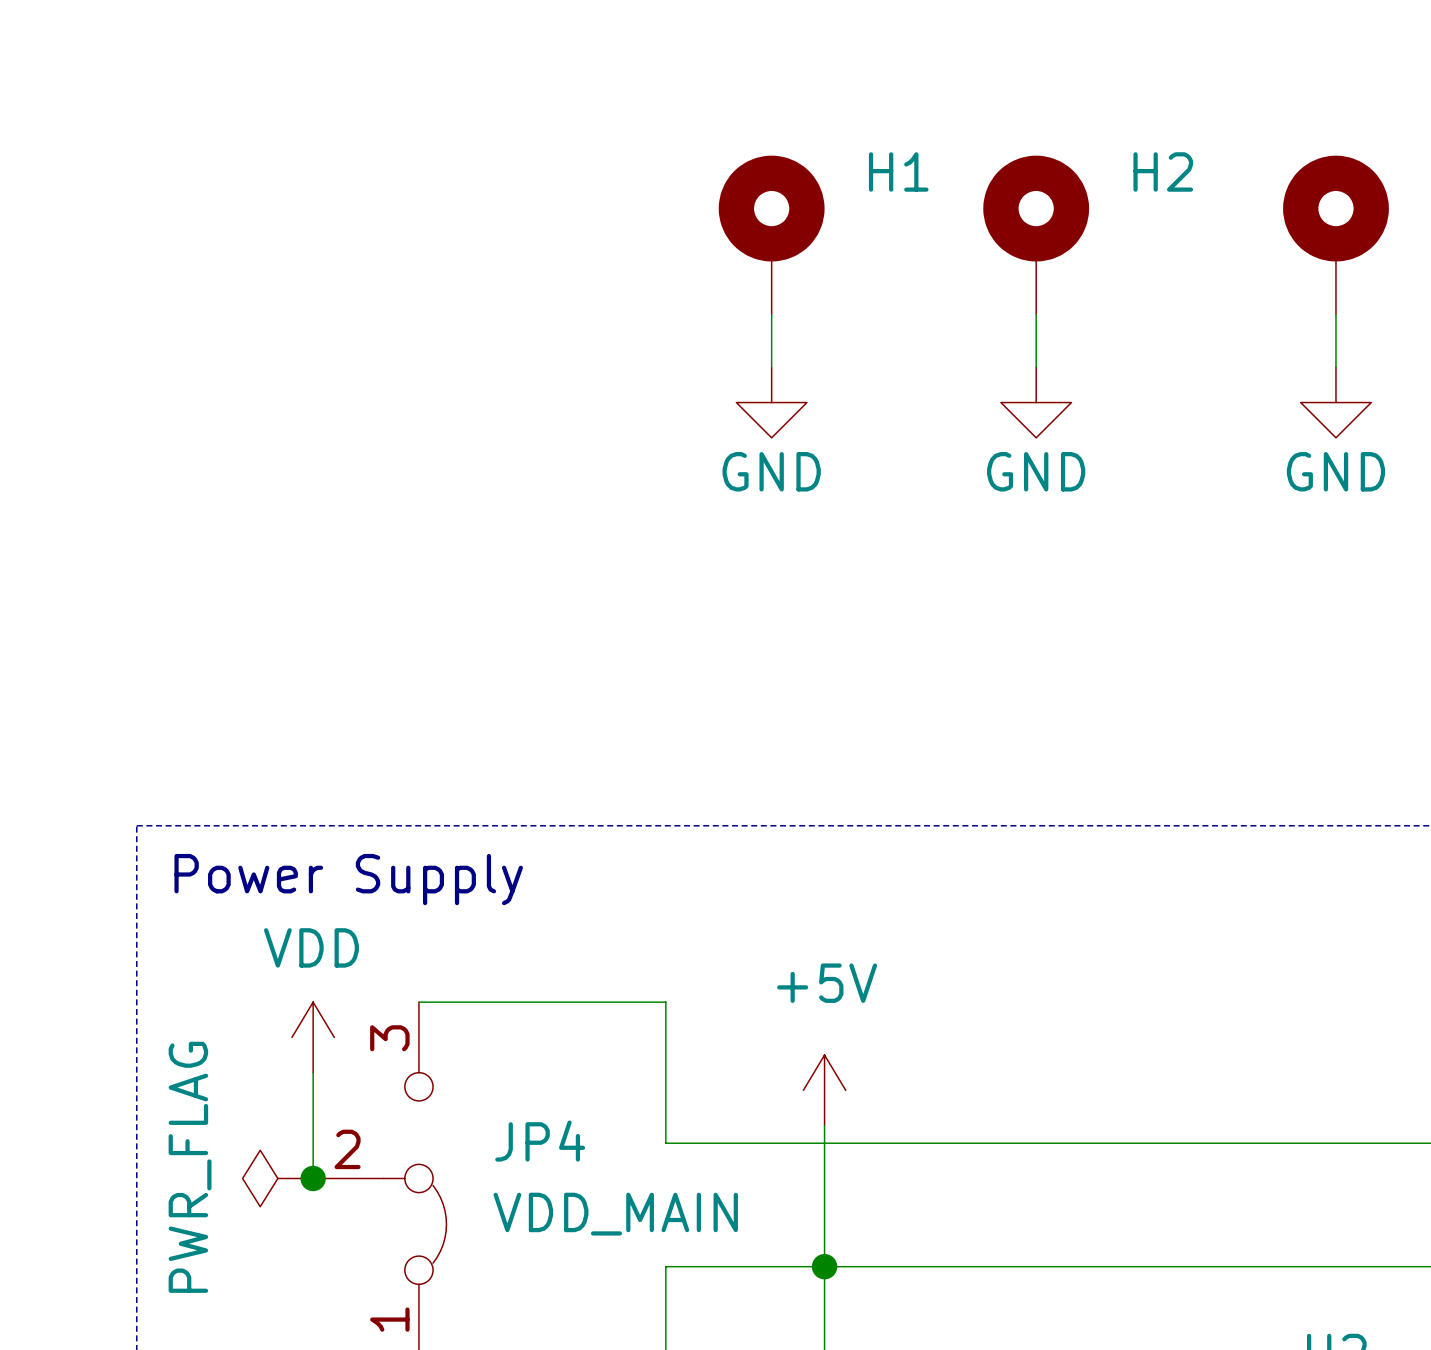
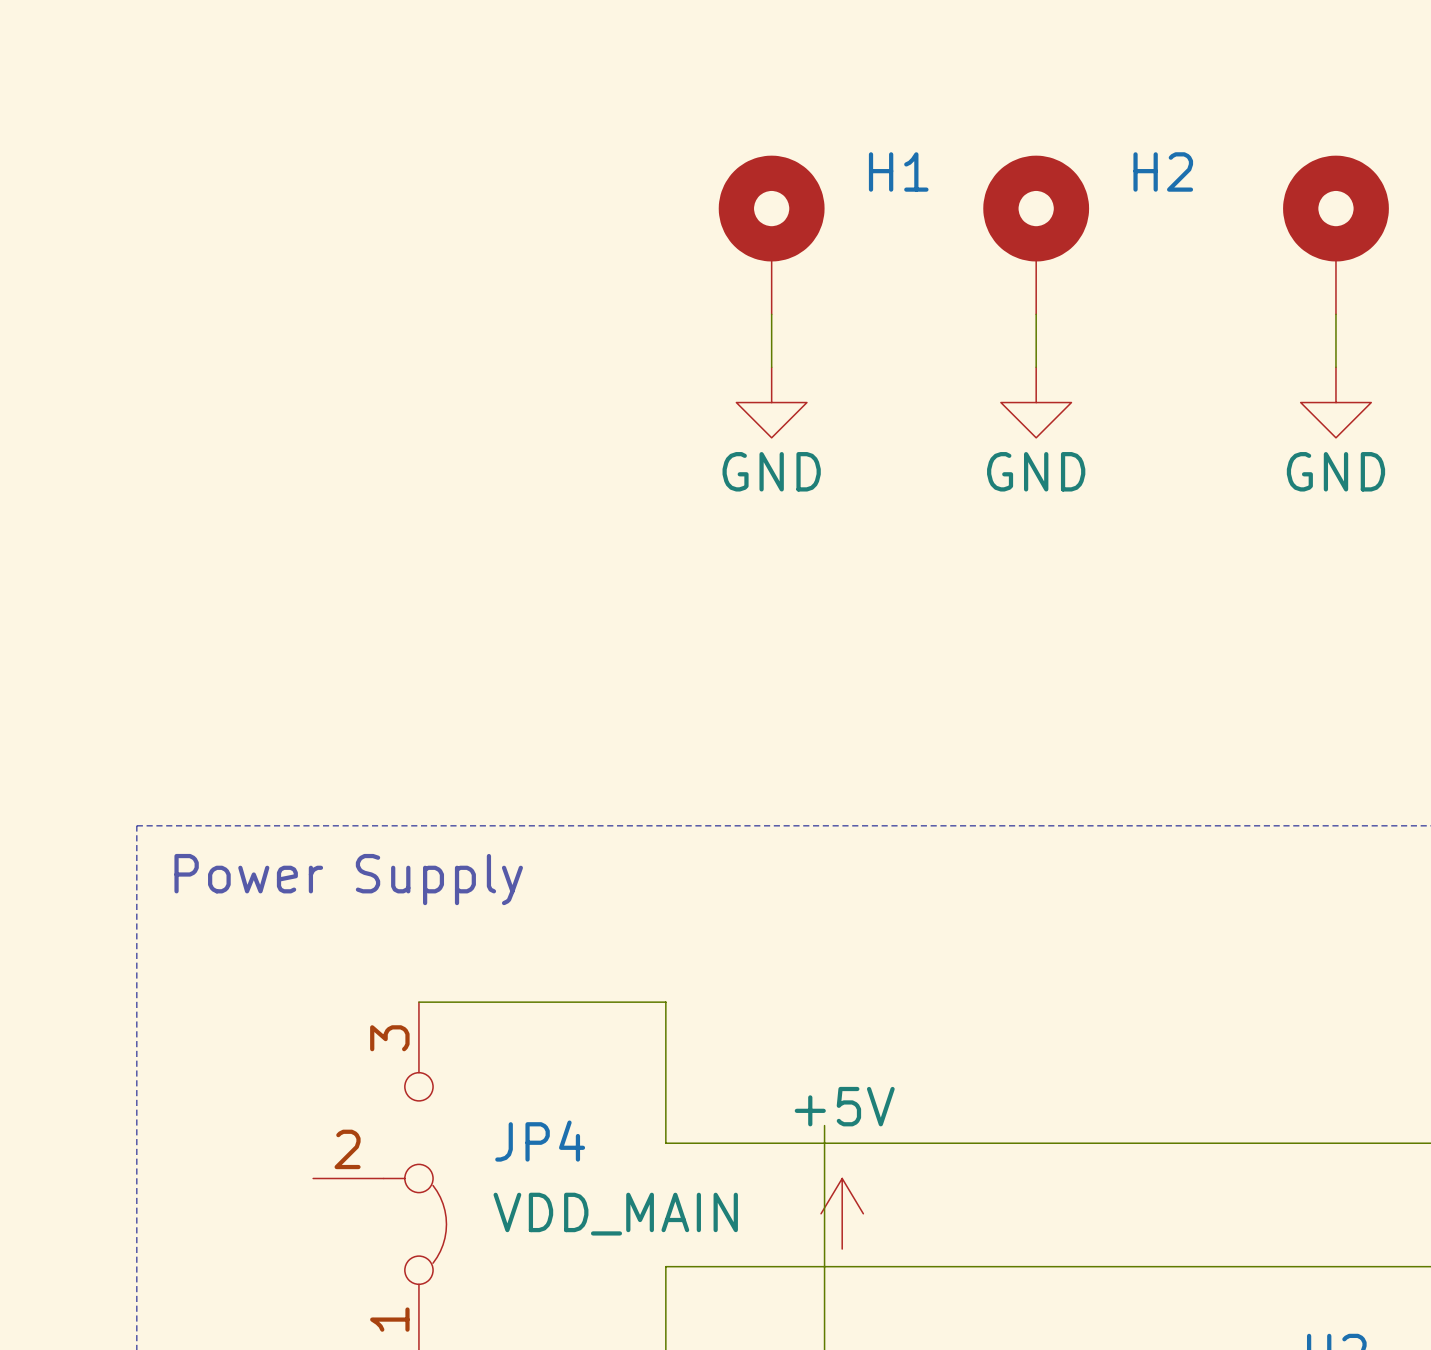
power symbol: VDD (313, 1037) -> none
wire: (313, 1072) (313, 1178) -> none
power symbol position: +5V (824, 1090) -> +5V (842, 1213)
power symbol: PWR_FLAG (277, 1178) -> none
junction: (313, 1178) -> none
junction: (824, 1266) -> none

